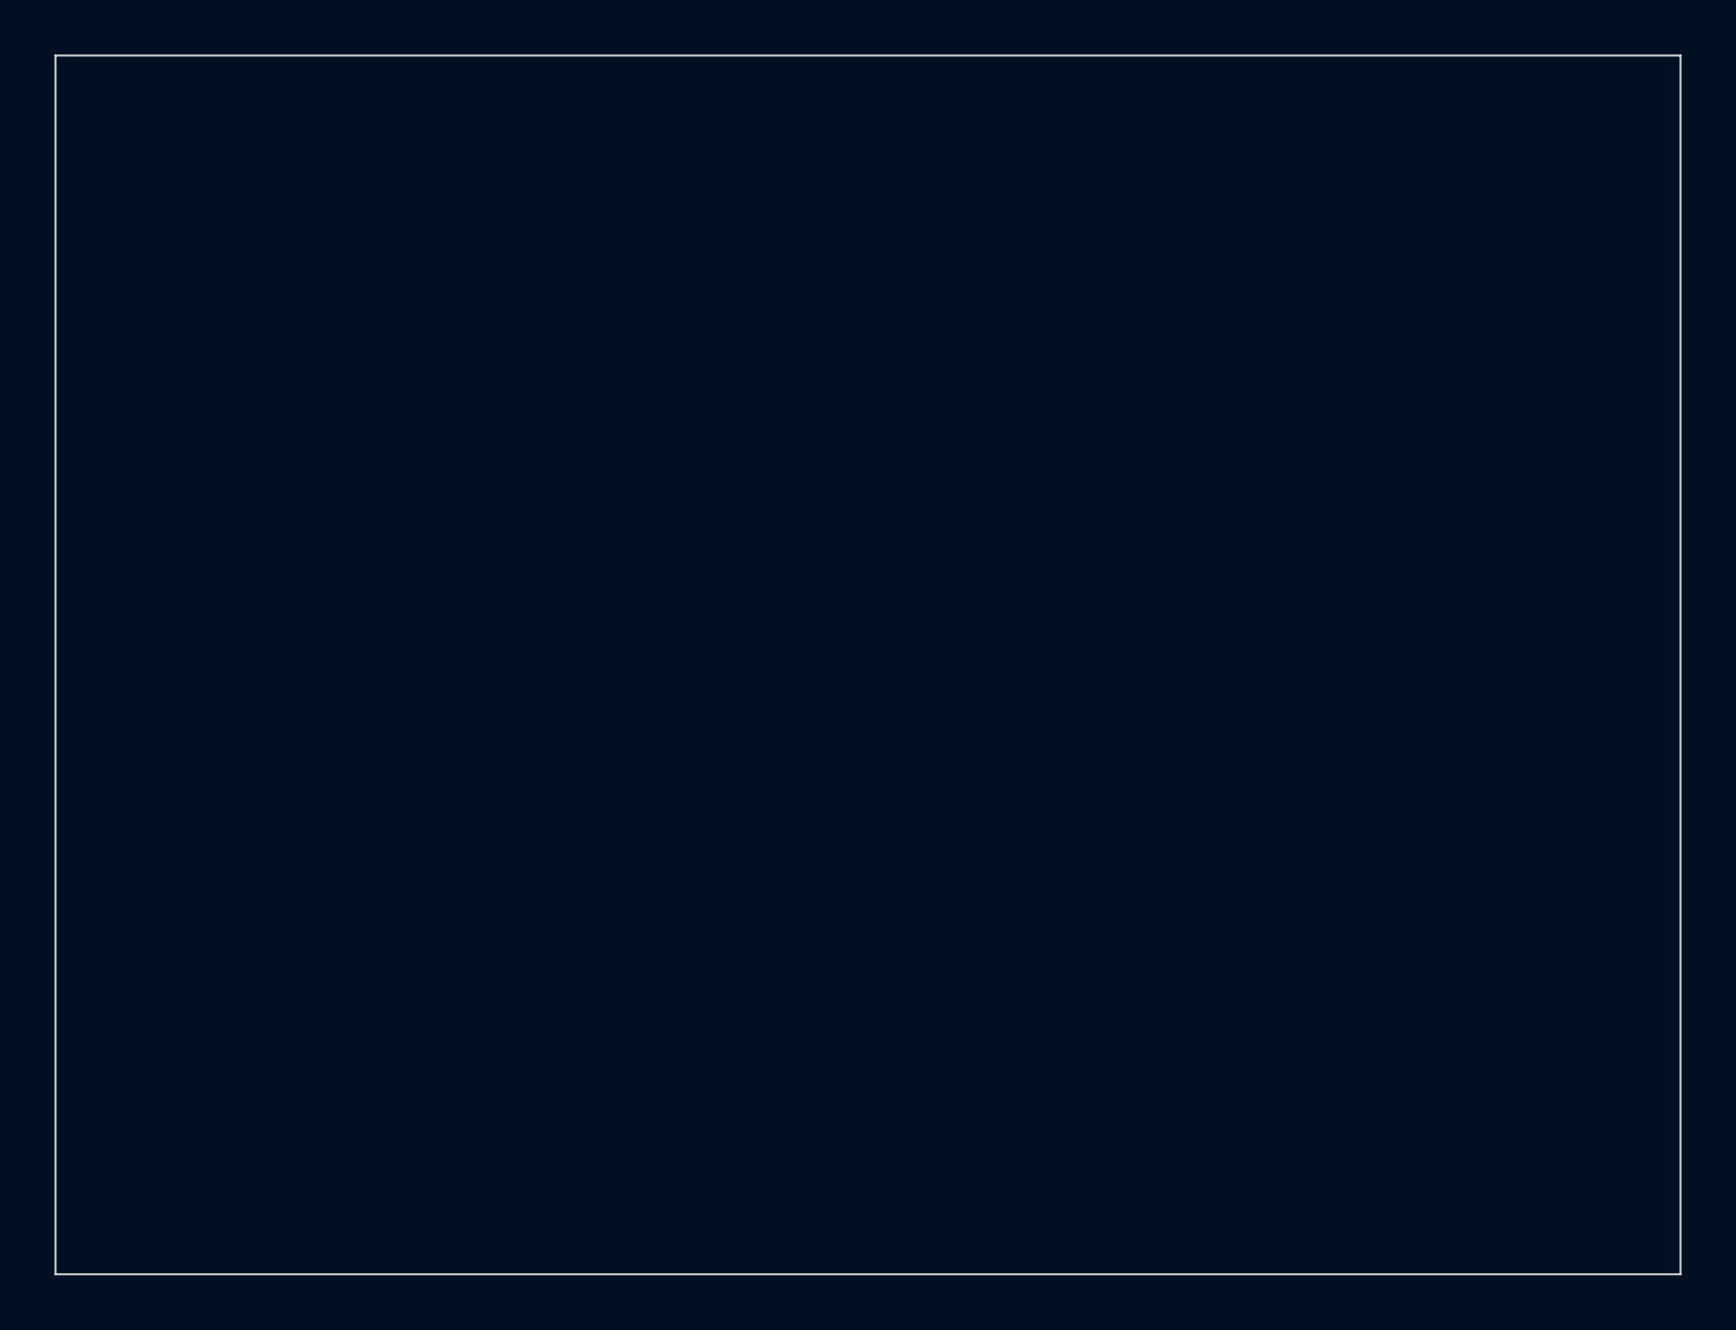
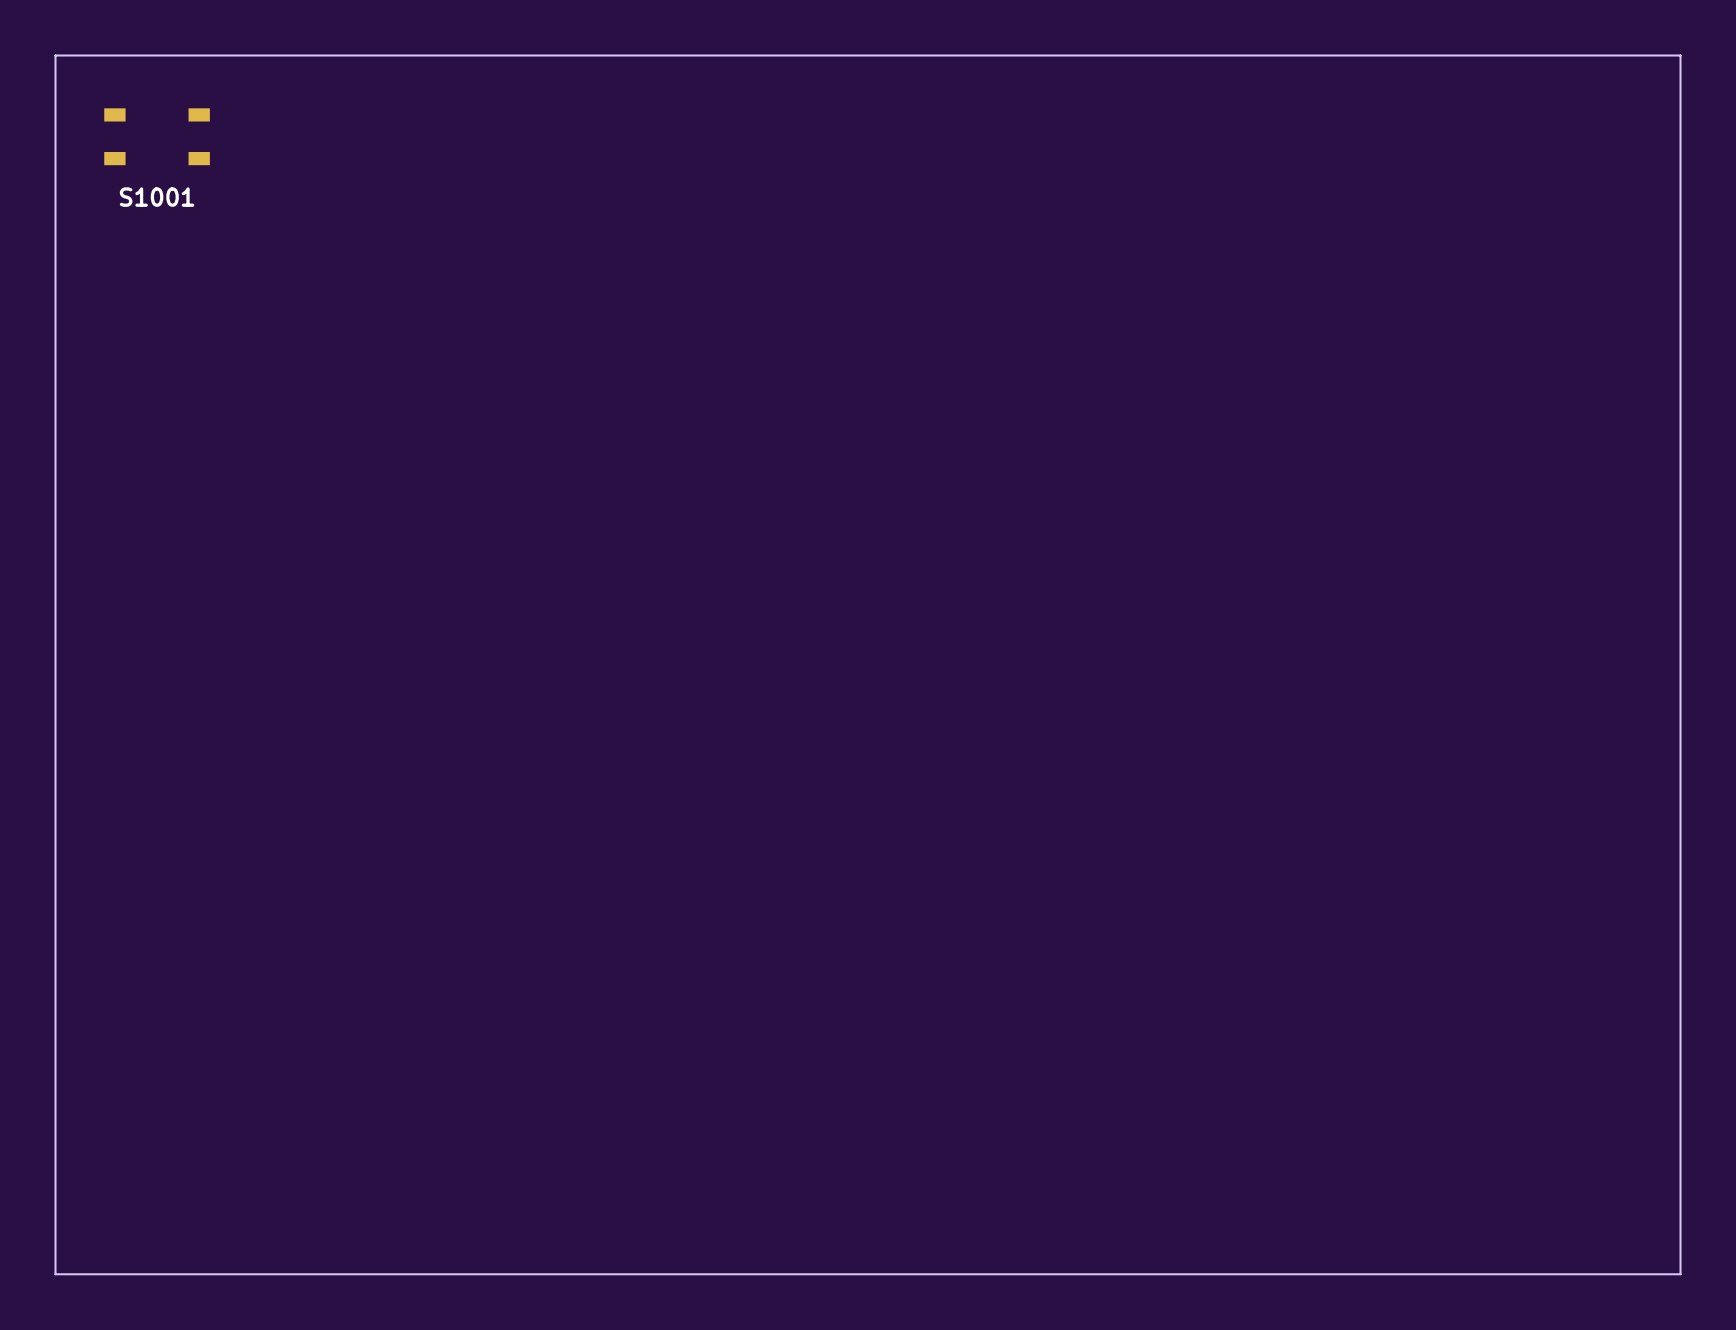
S1001: none -> (157, 136)

